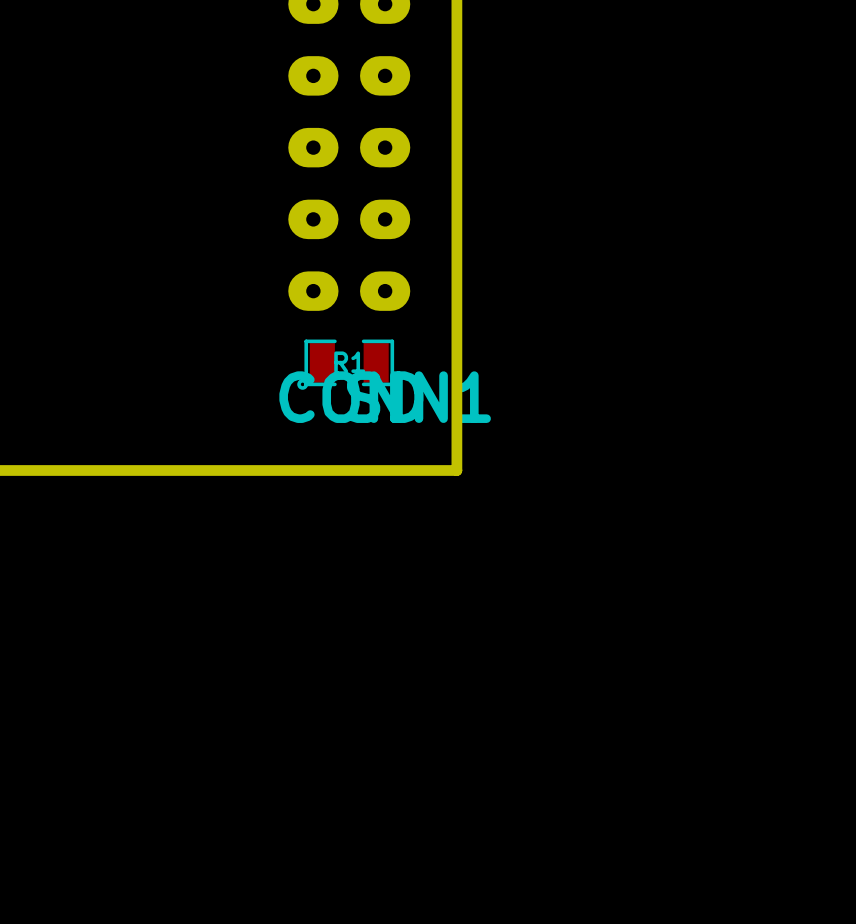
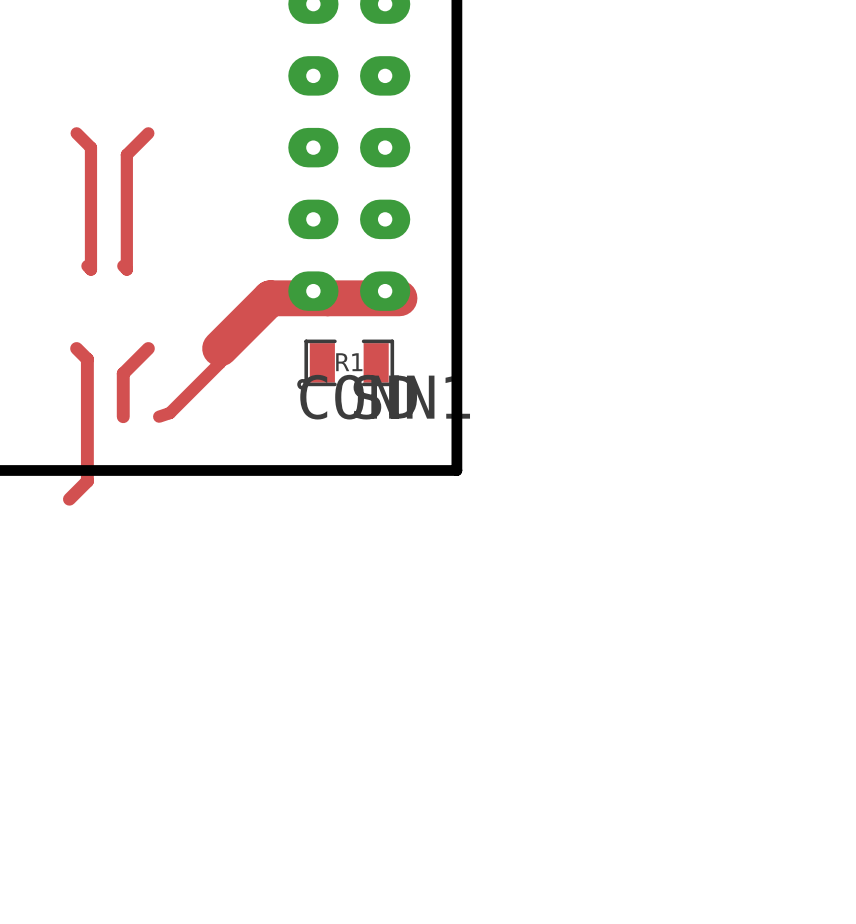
track: none -> (76, 133) (90, 147) (90, 269) (87, 266)
track: none -> (148, 133) (126, 154) (126, 269) (123, 266)
track: none -> (399, 298) (270, 298) (220, 348) (220, 362) (169, 413) (159, 416)
track: none -> (76, 348) (87, 359) (87, 481) (69, 499)
track: none -> (148, 348) (123, 373) (123, 416)

